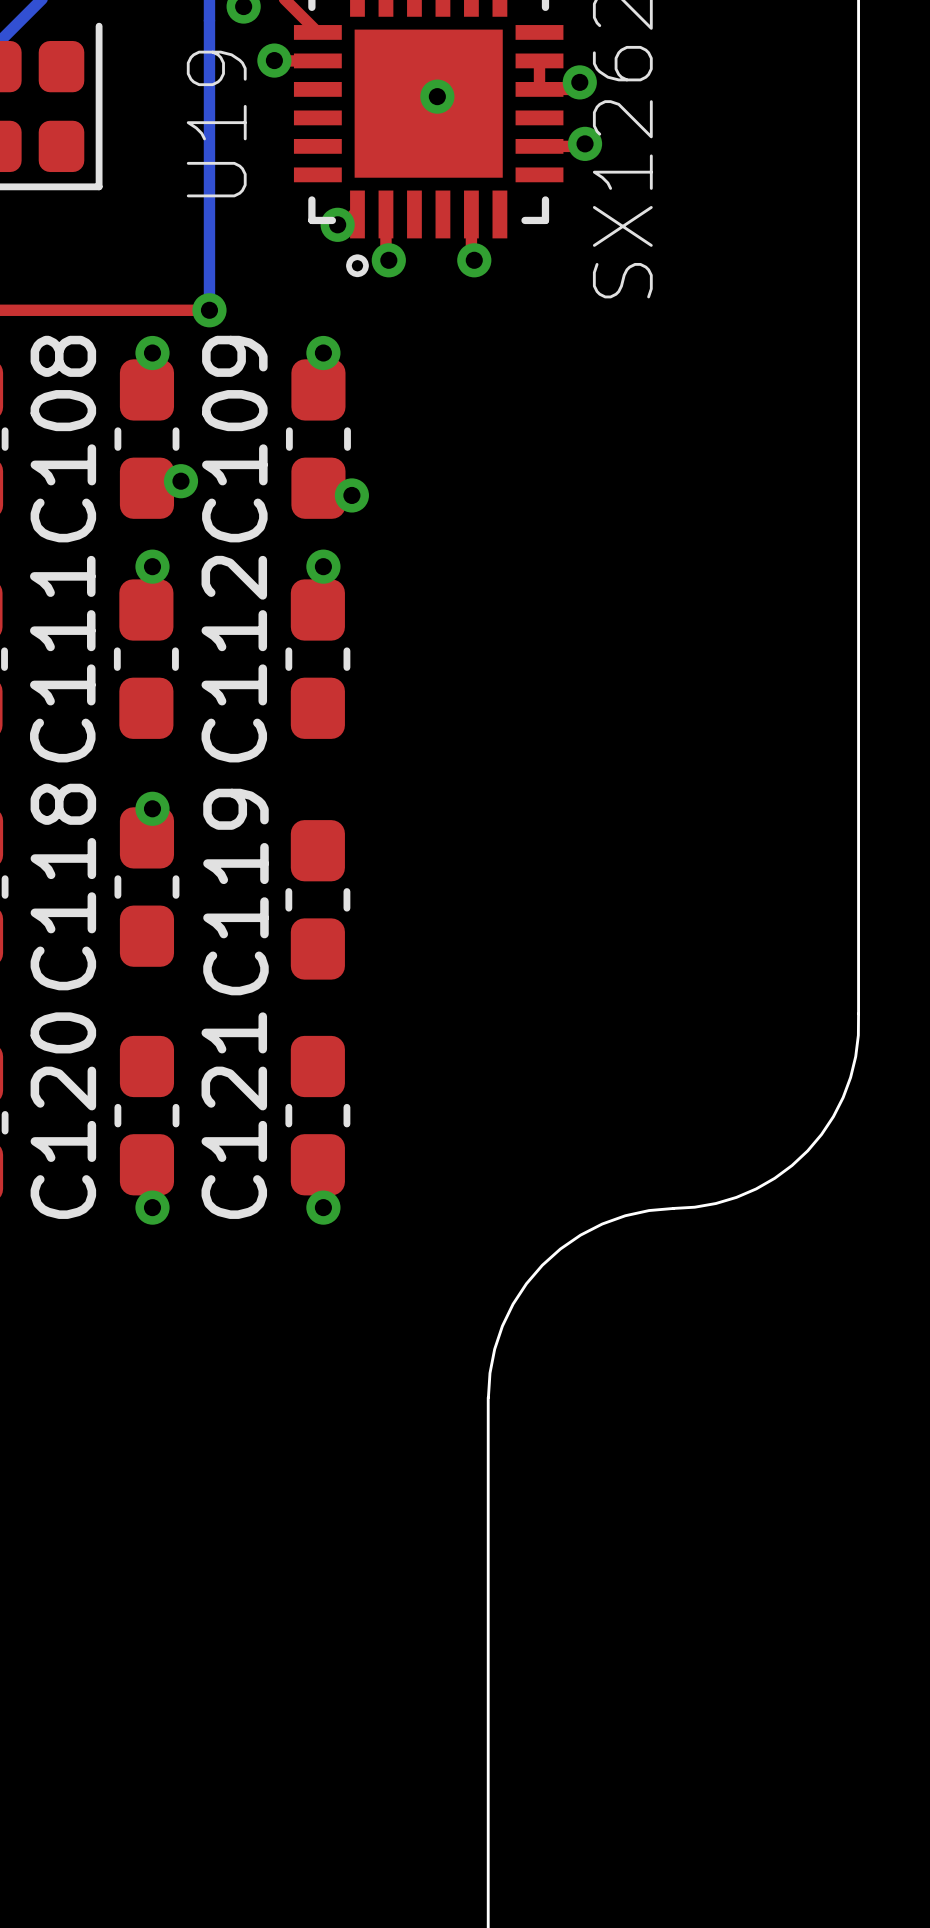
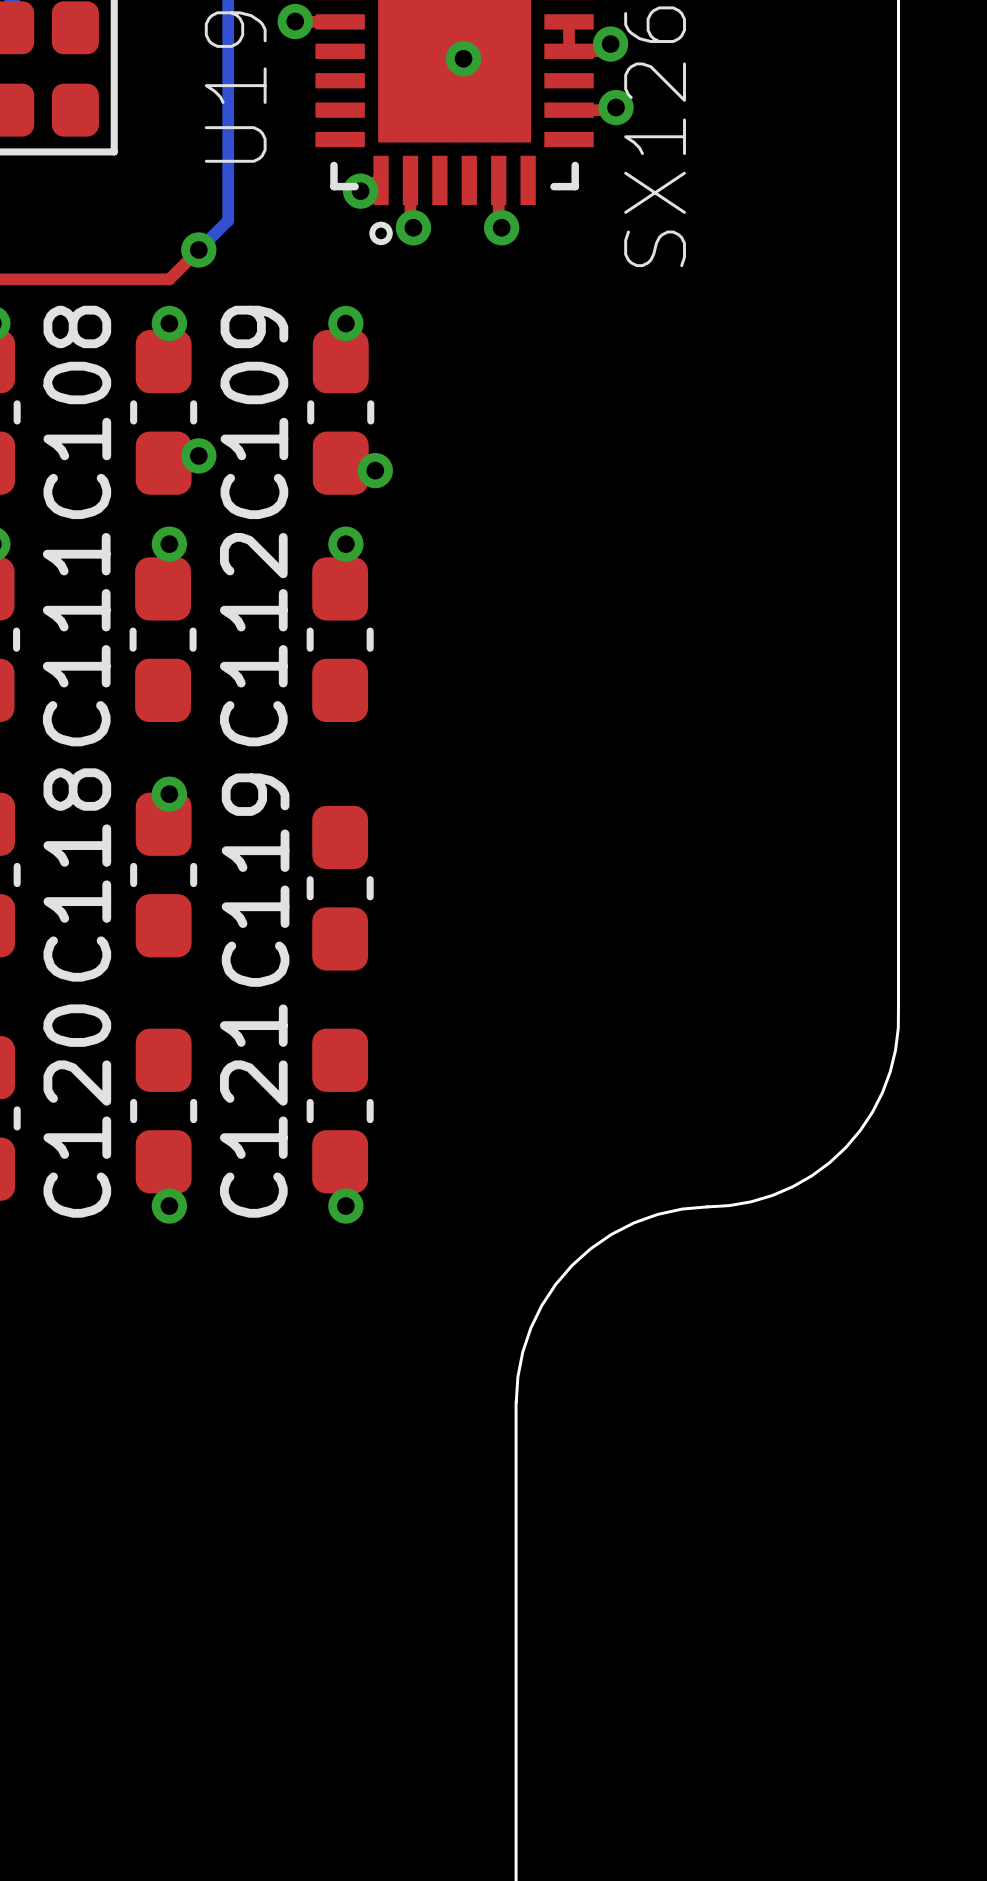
bottom track: (209, 253) (209, 310) -> (228, 220) (198, 249)
top track: (152, 310) (209, 310) -> (169, 279) (198, 249)
via position: (209, 310) -> (198, 249)

